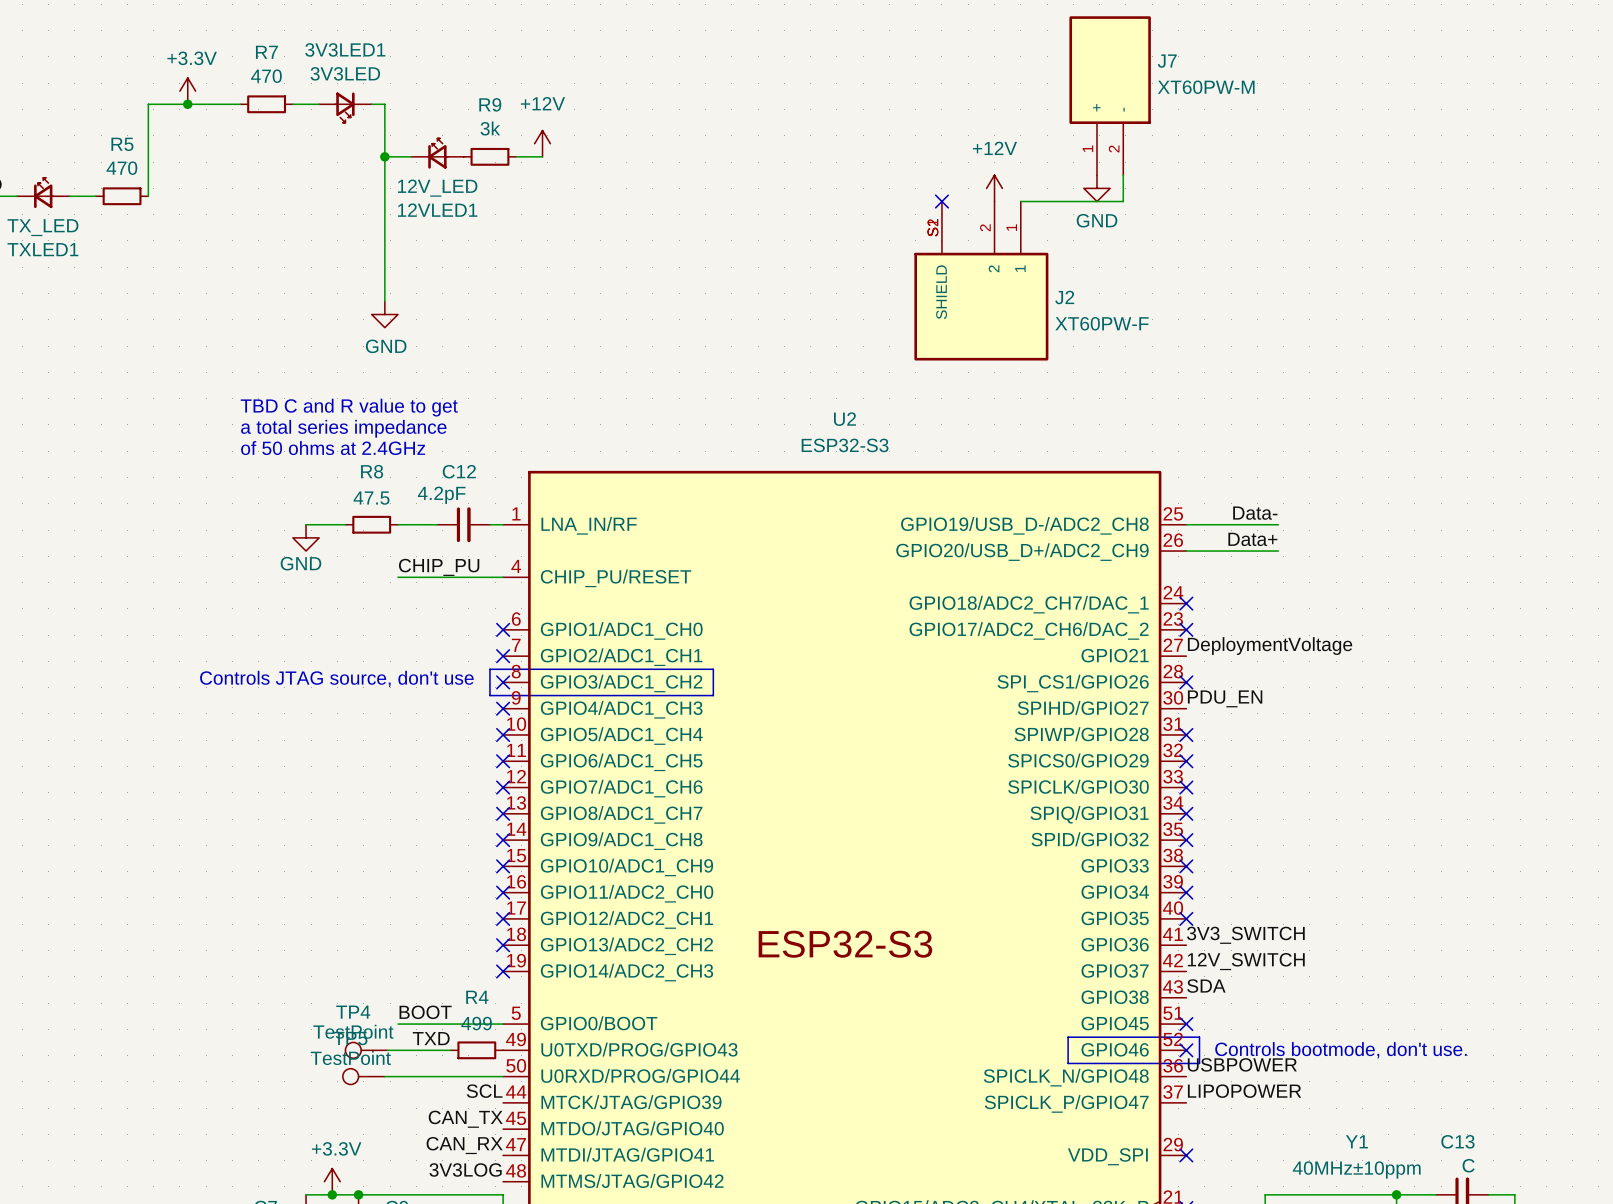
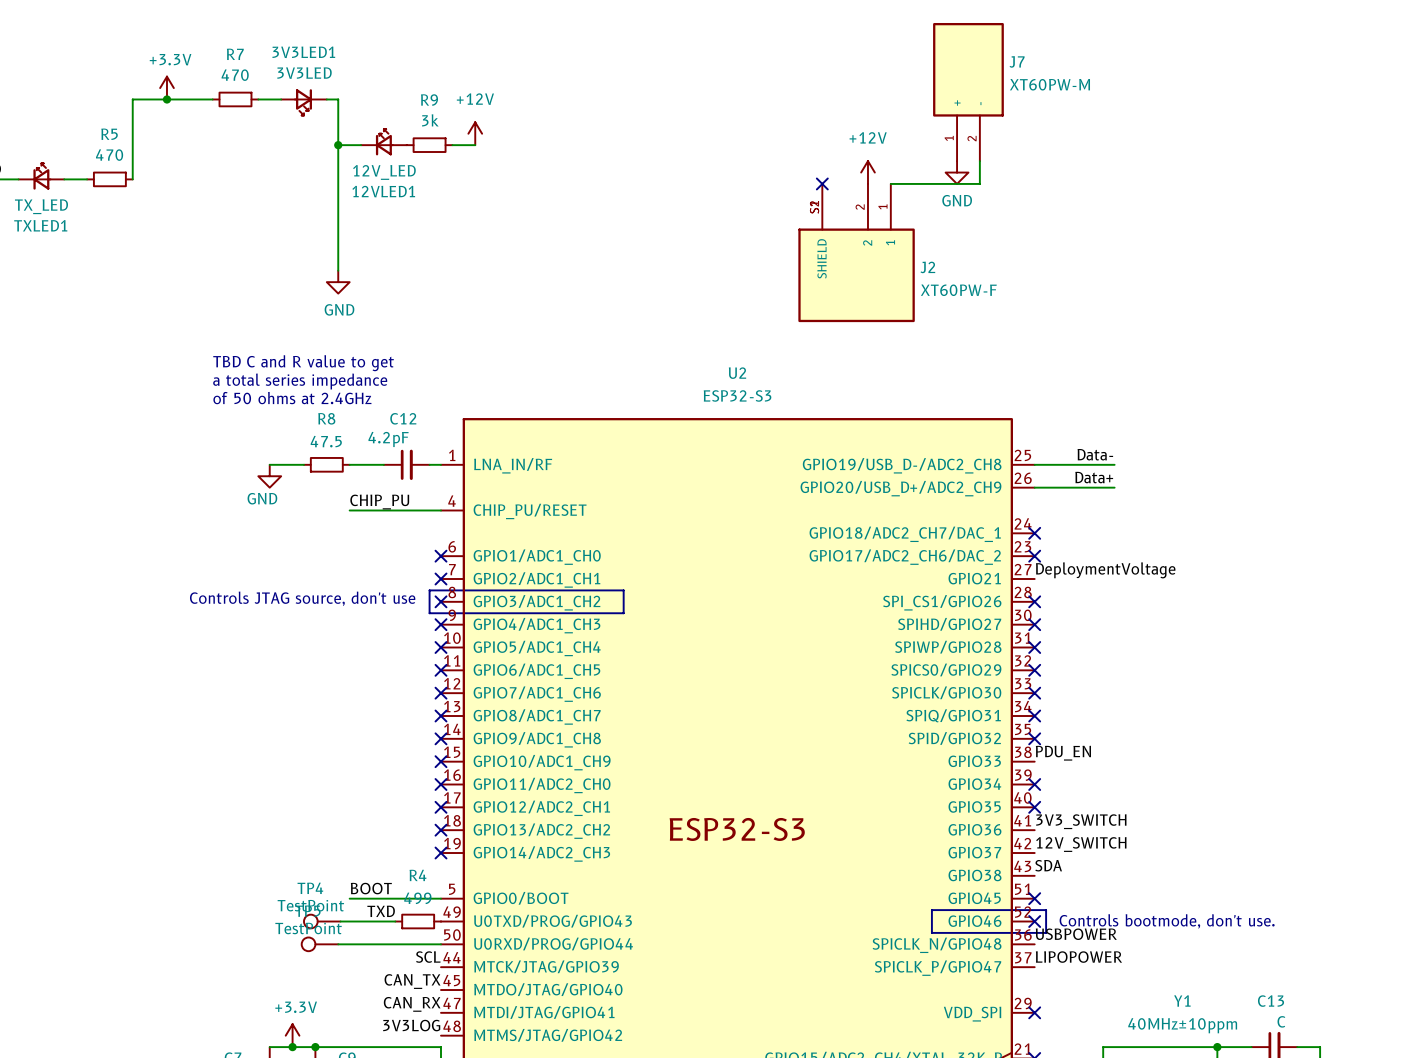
label position: PDU_EN (1225, 698) -> PDU_EN (1063, 753)
no-connect mark: none -> (1034, 624)
no-connect mark: (1186, 866) -> none

